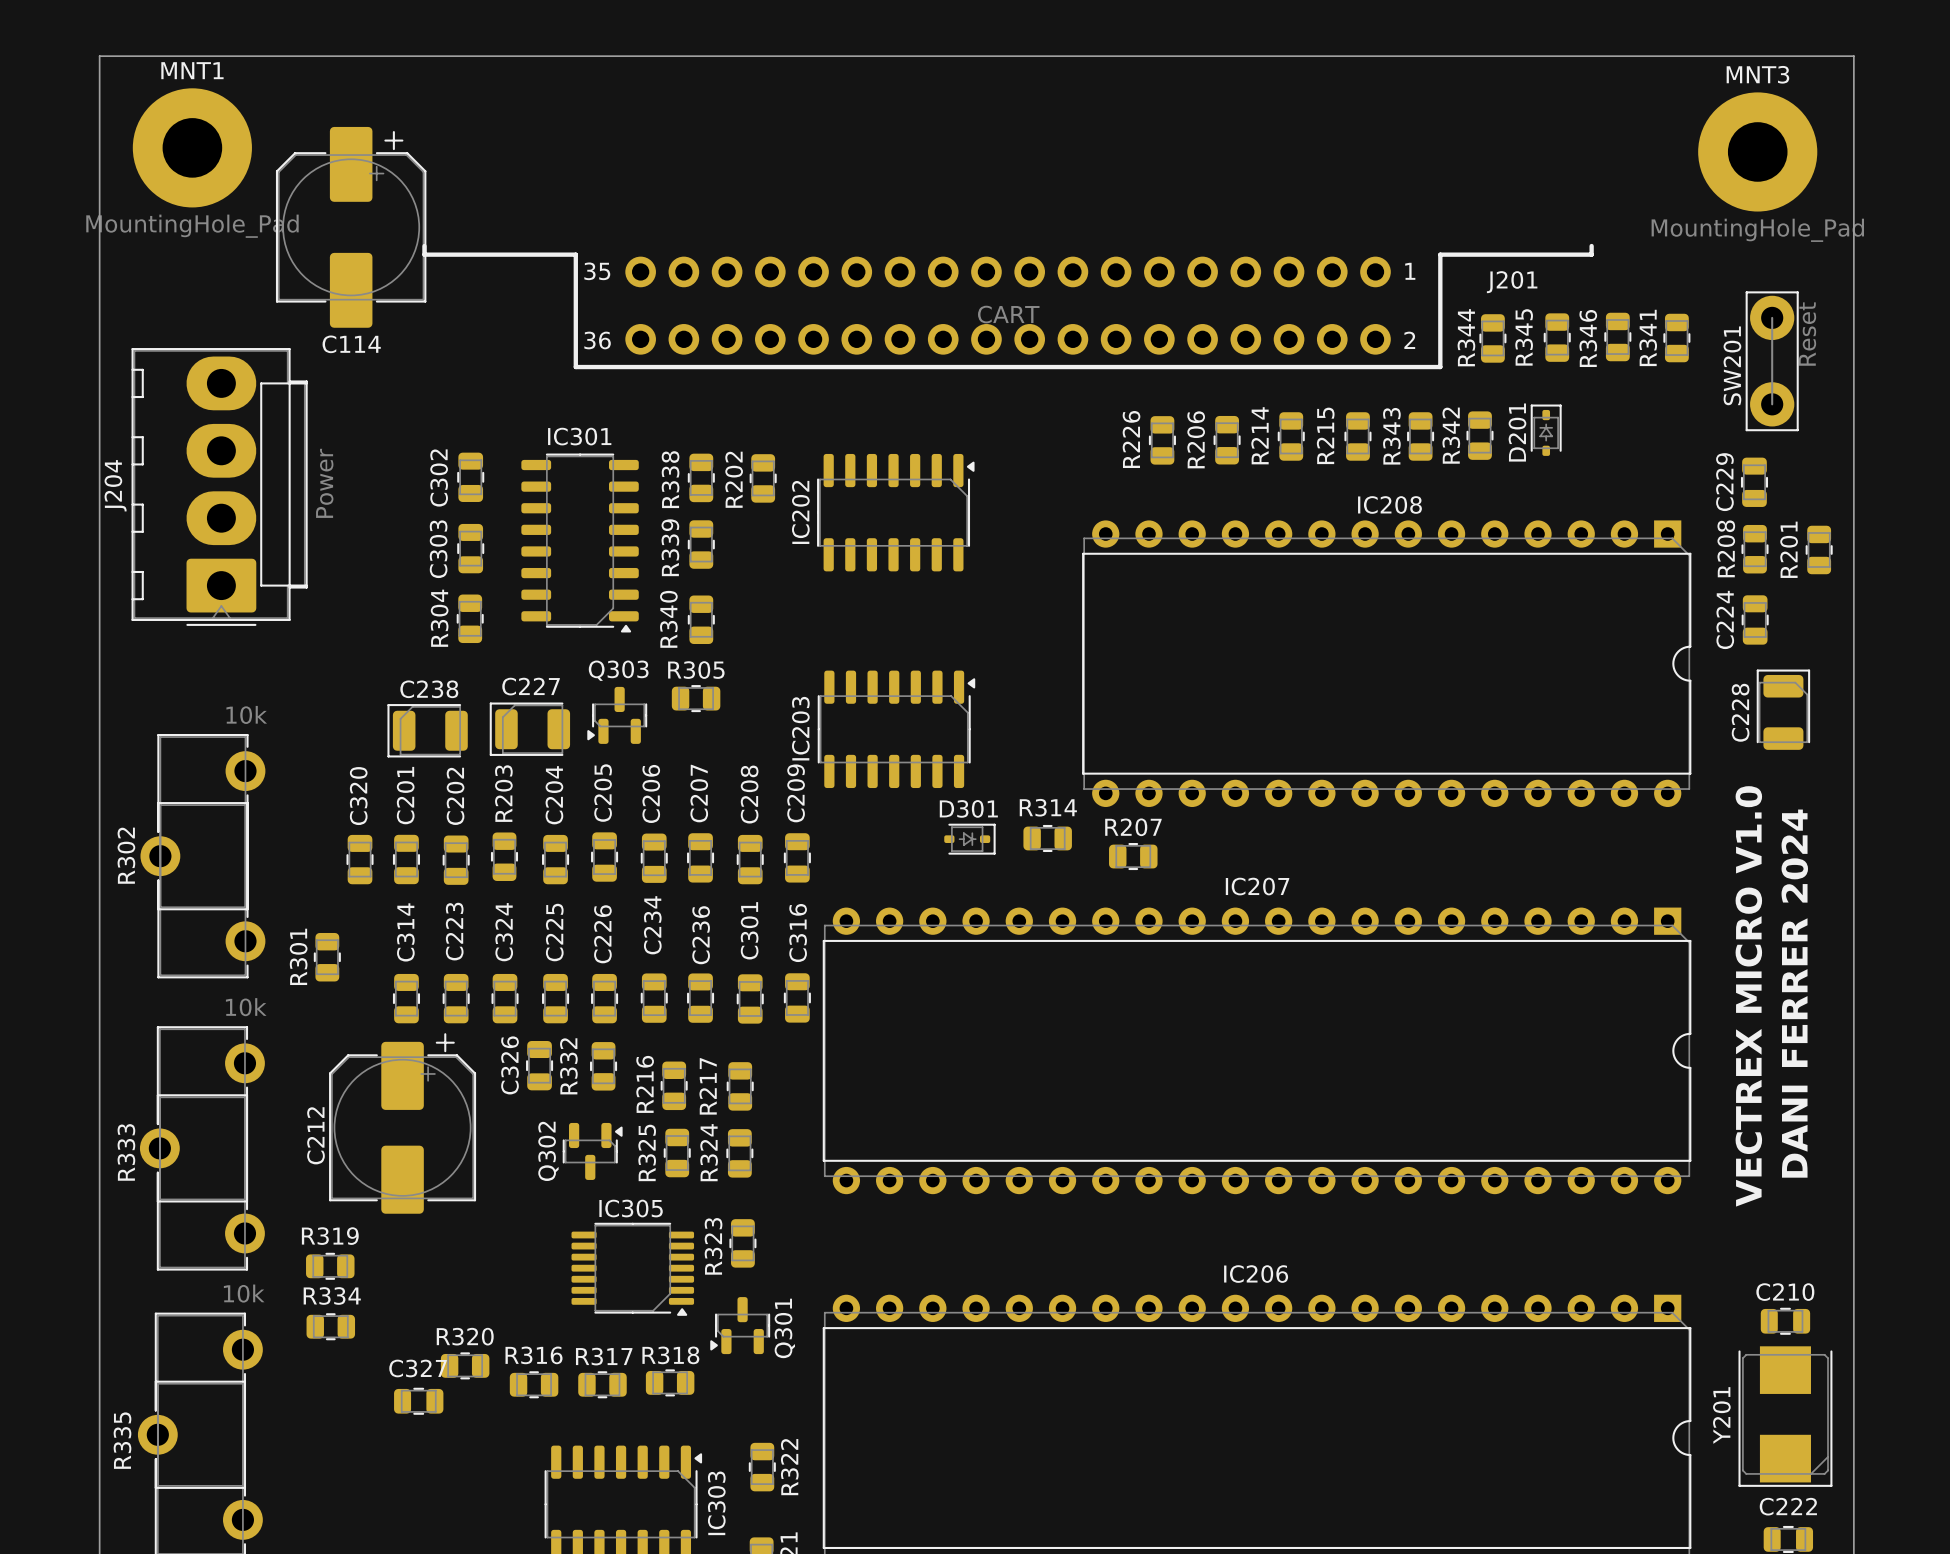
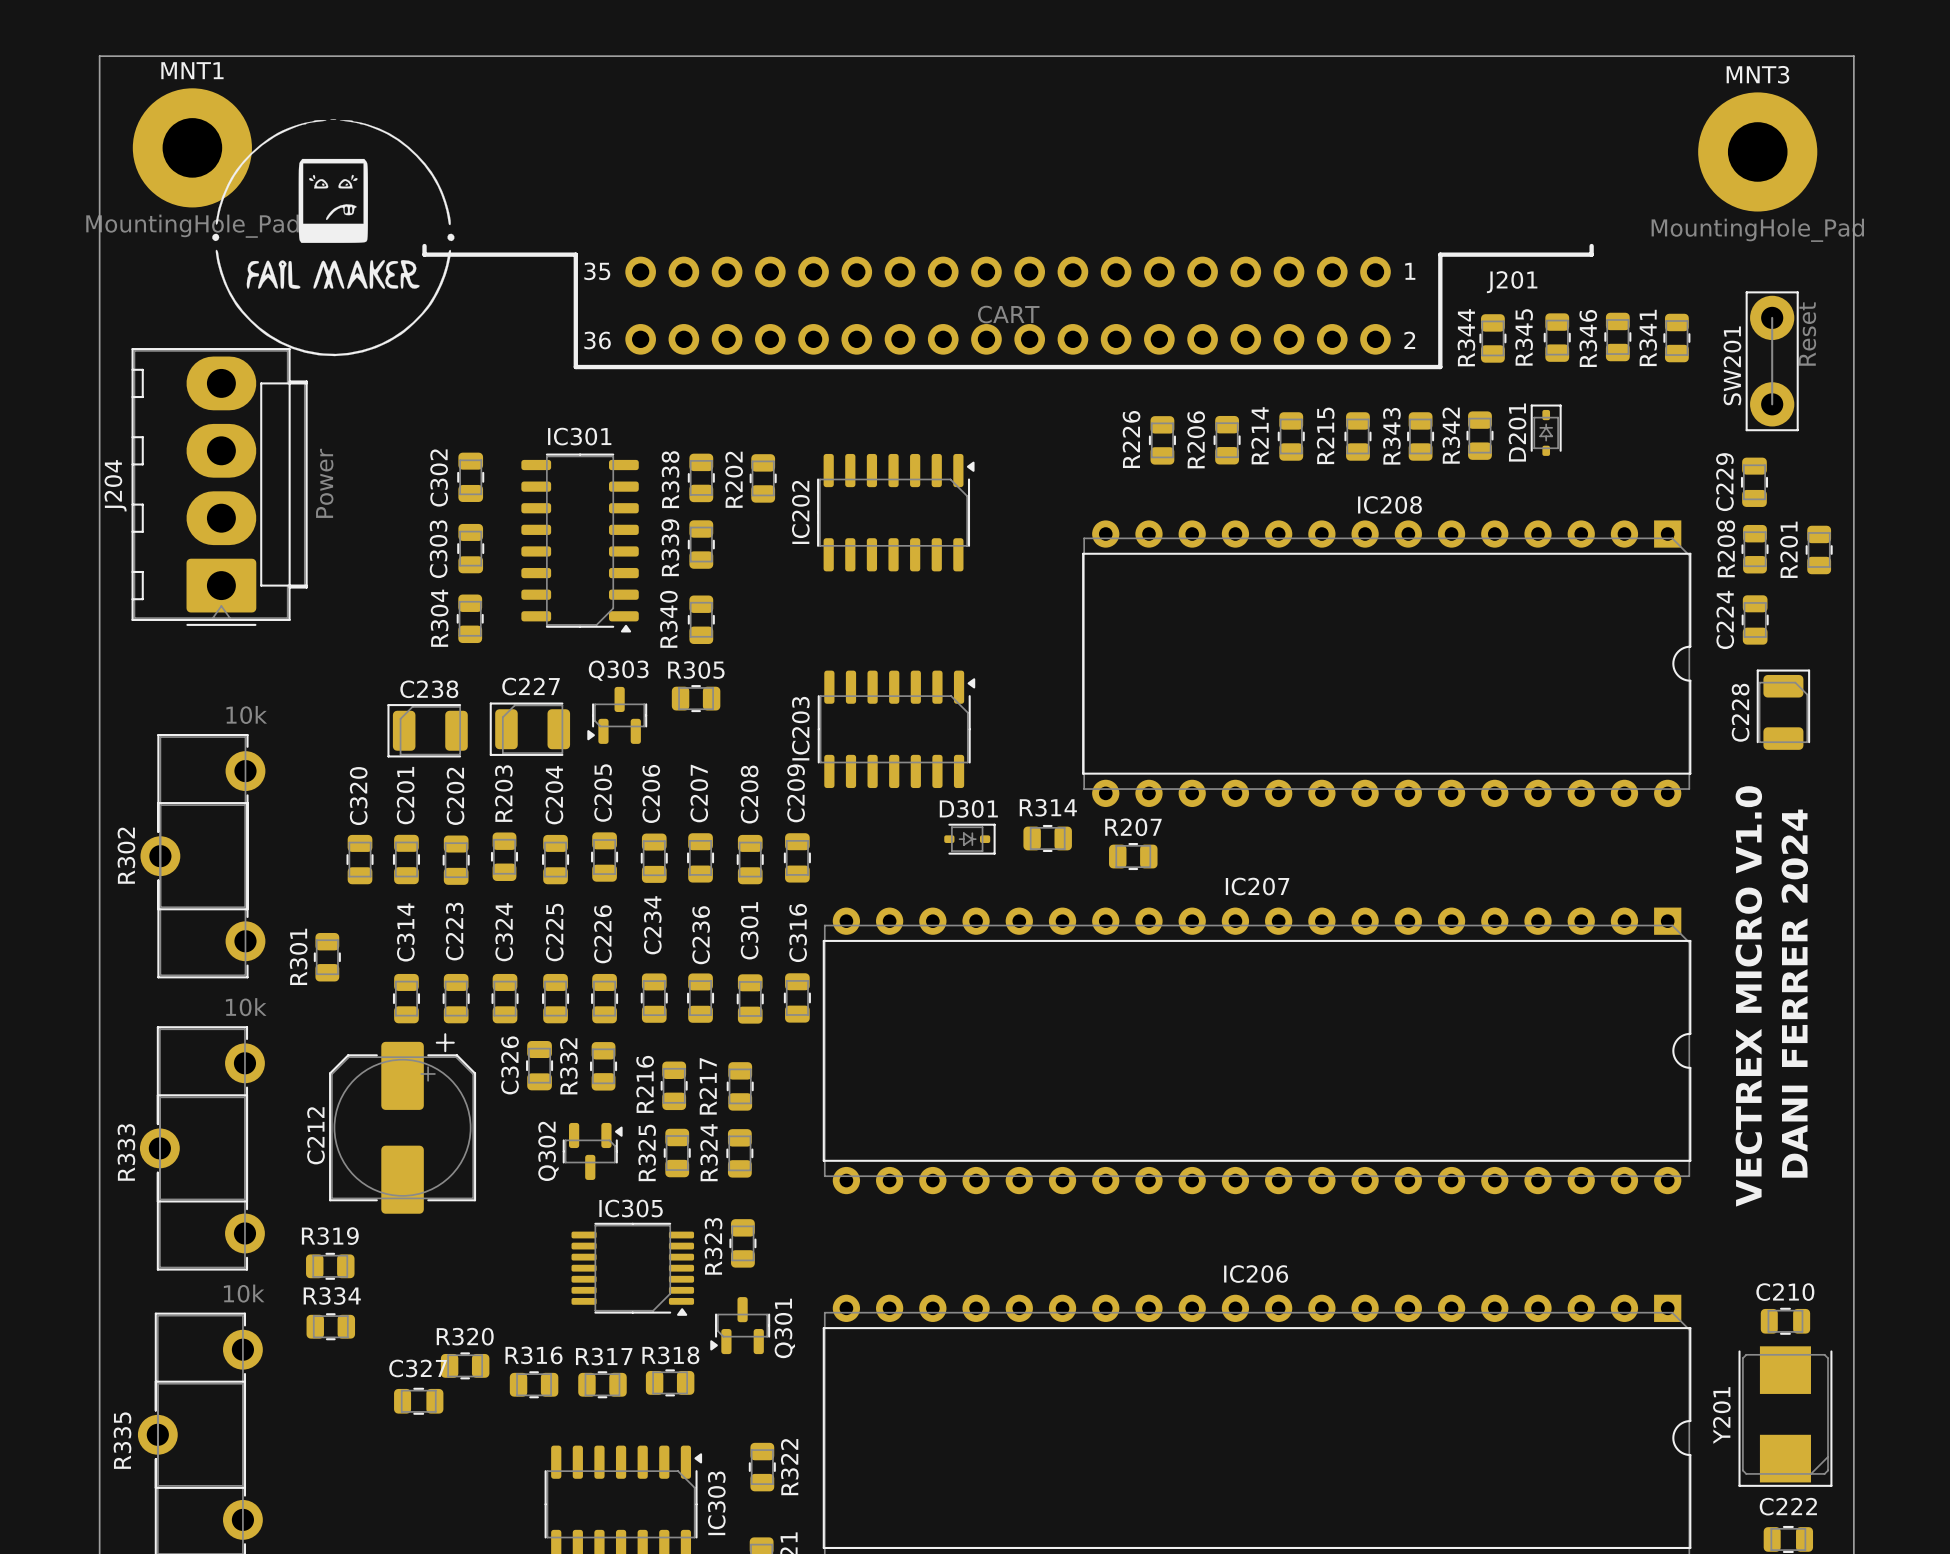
drawing: none -> [212, 119, 455, 357]
C114: (351, 227) -> none

